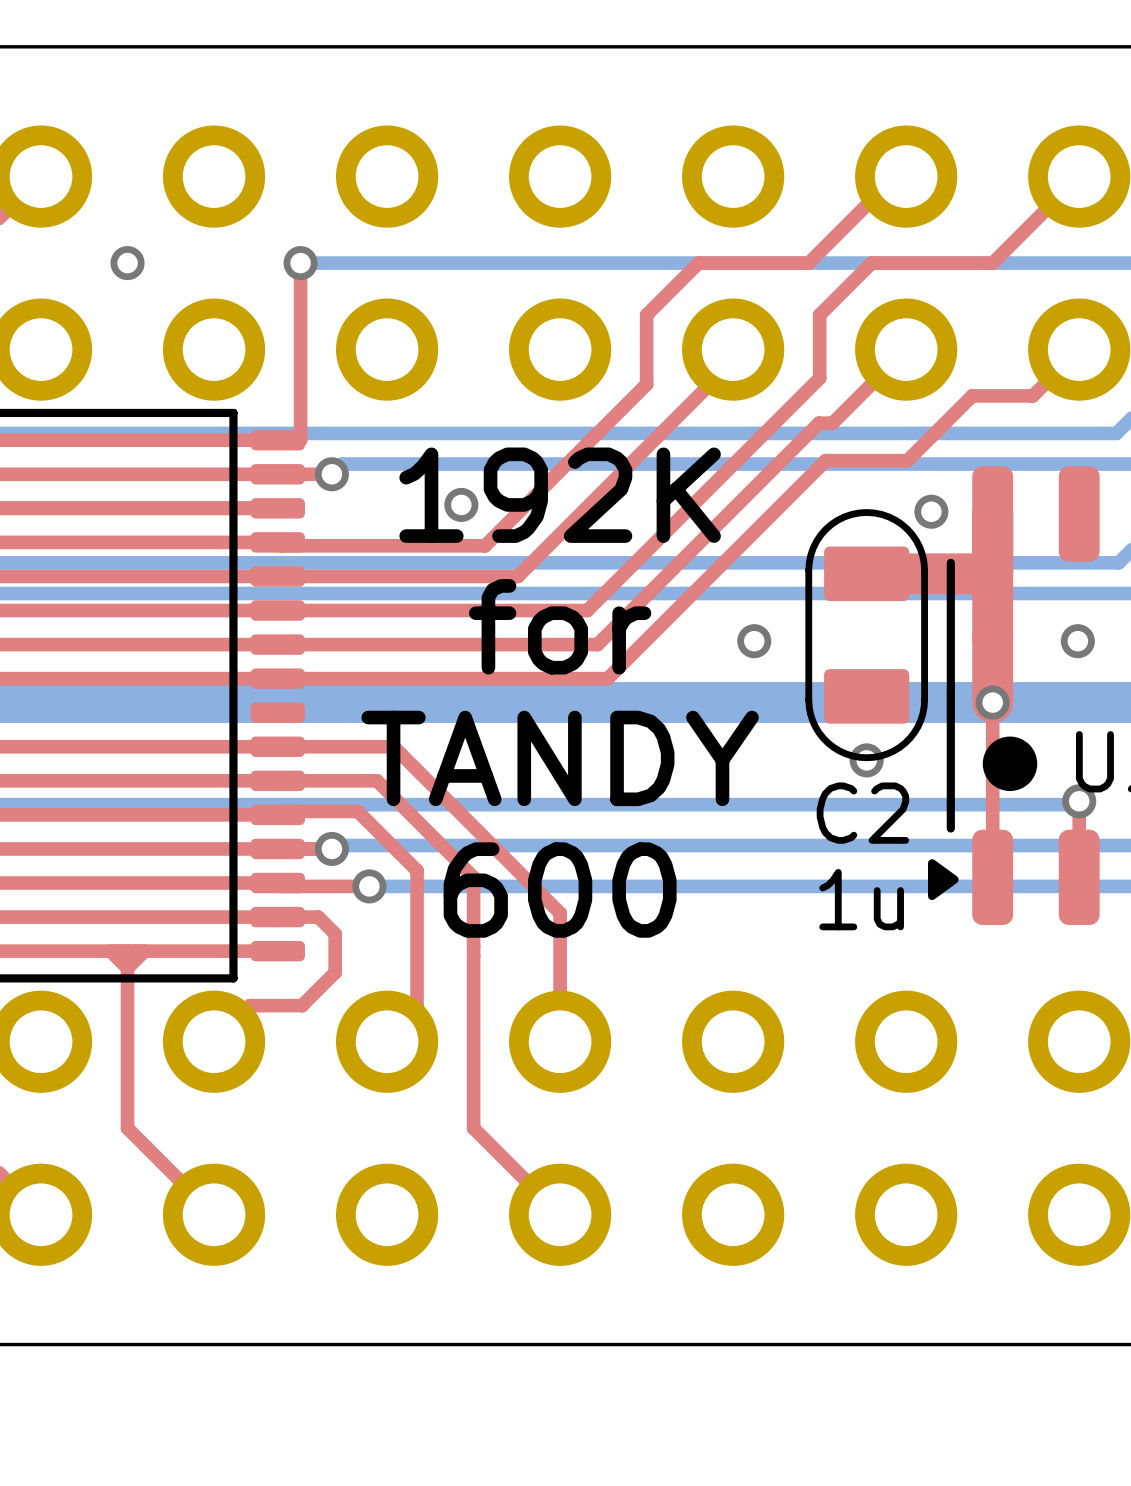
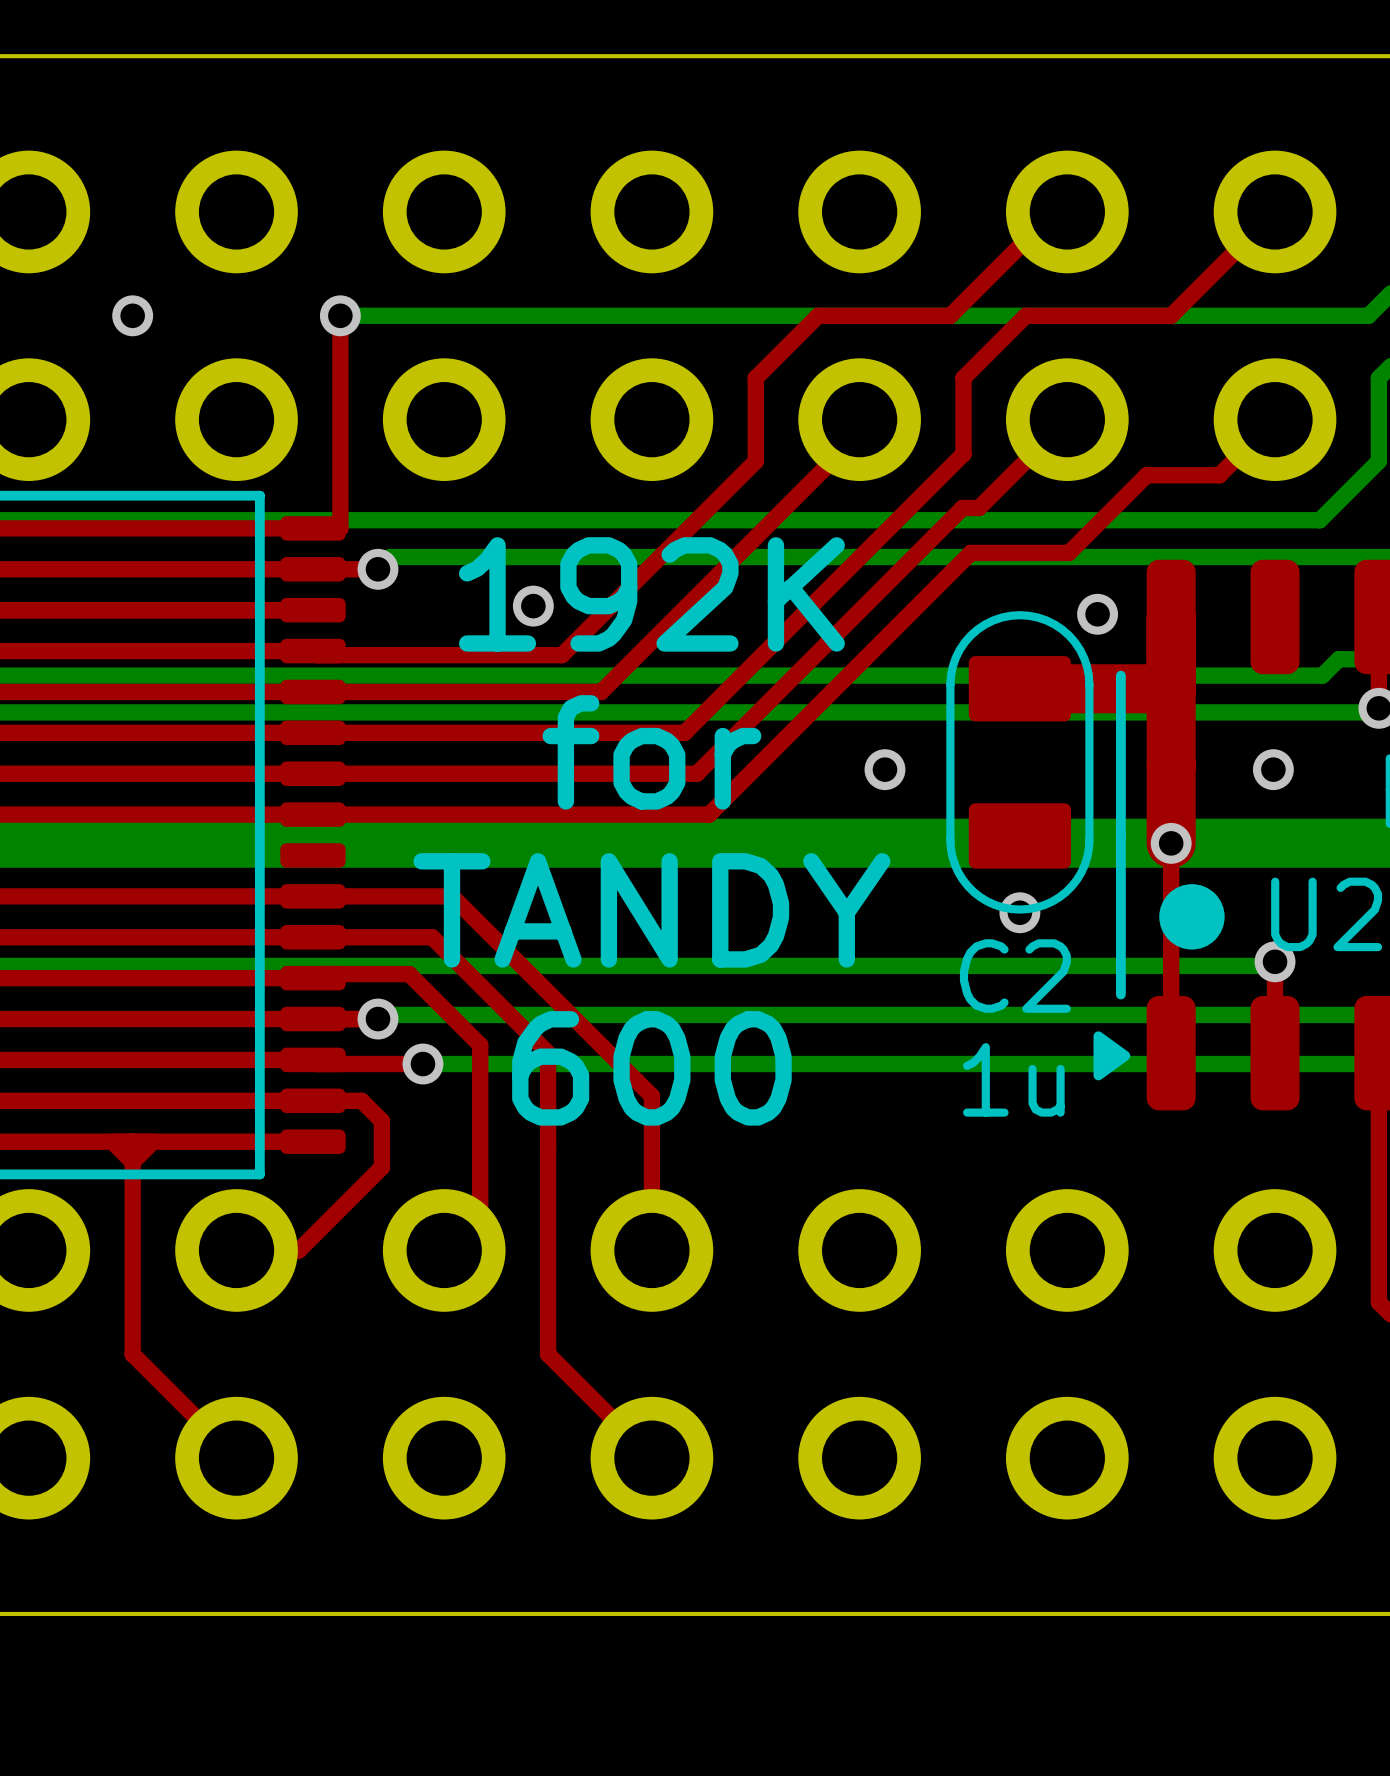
top track: (302, 1005) (250, 1005) (214, 1041) -> (342, 1207) (298, 1250) (236, 1250)

